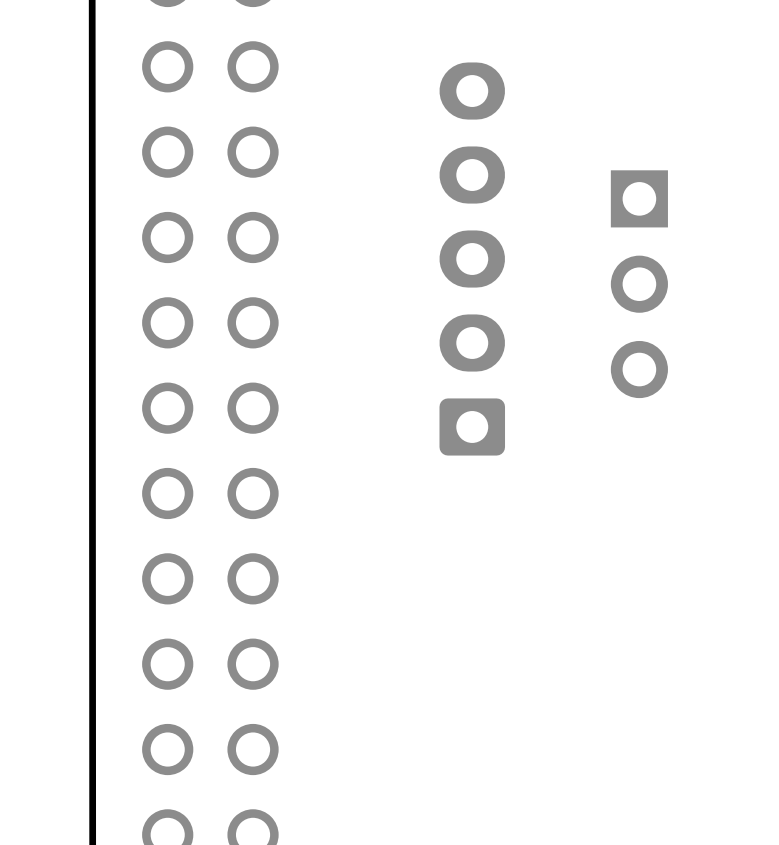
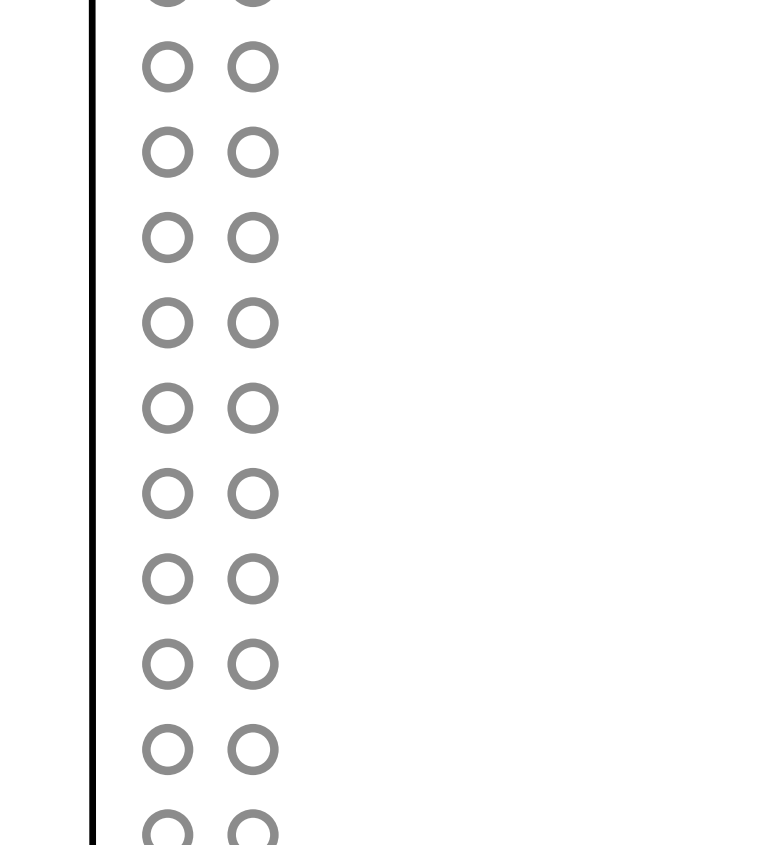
part: (472, 259) -> none
part: (639, 284) -> none

